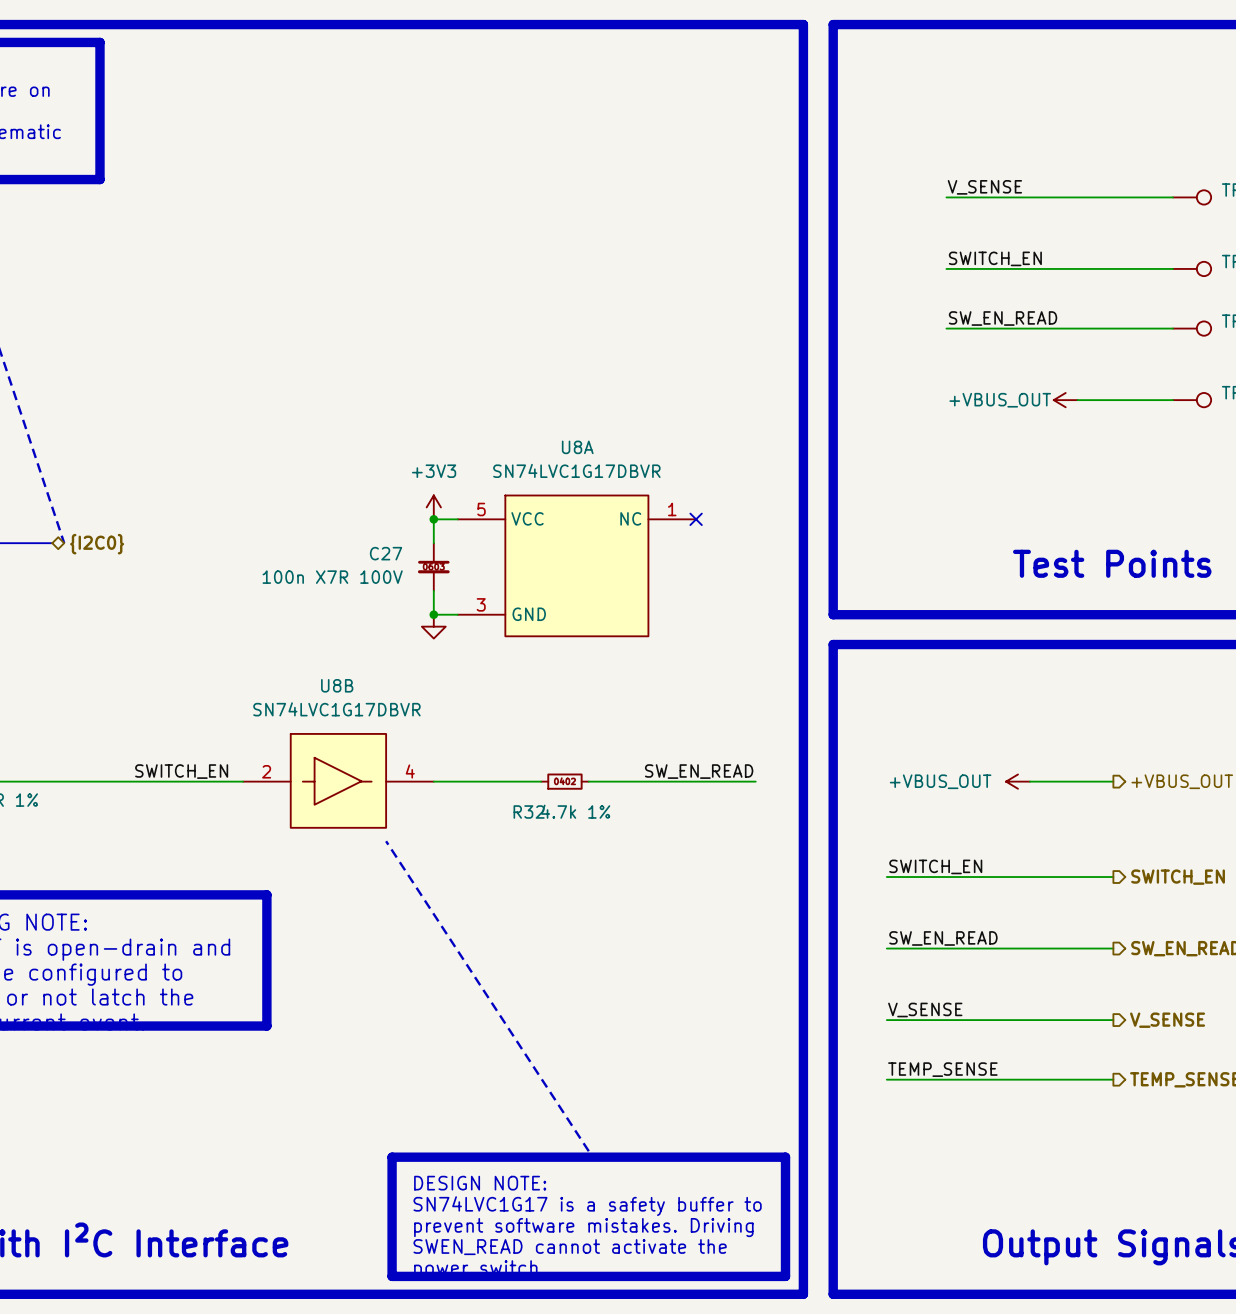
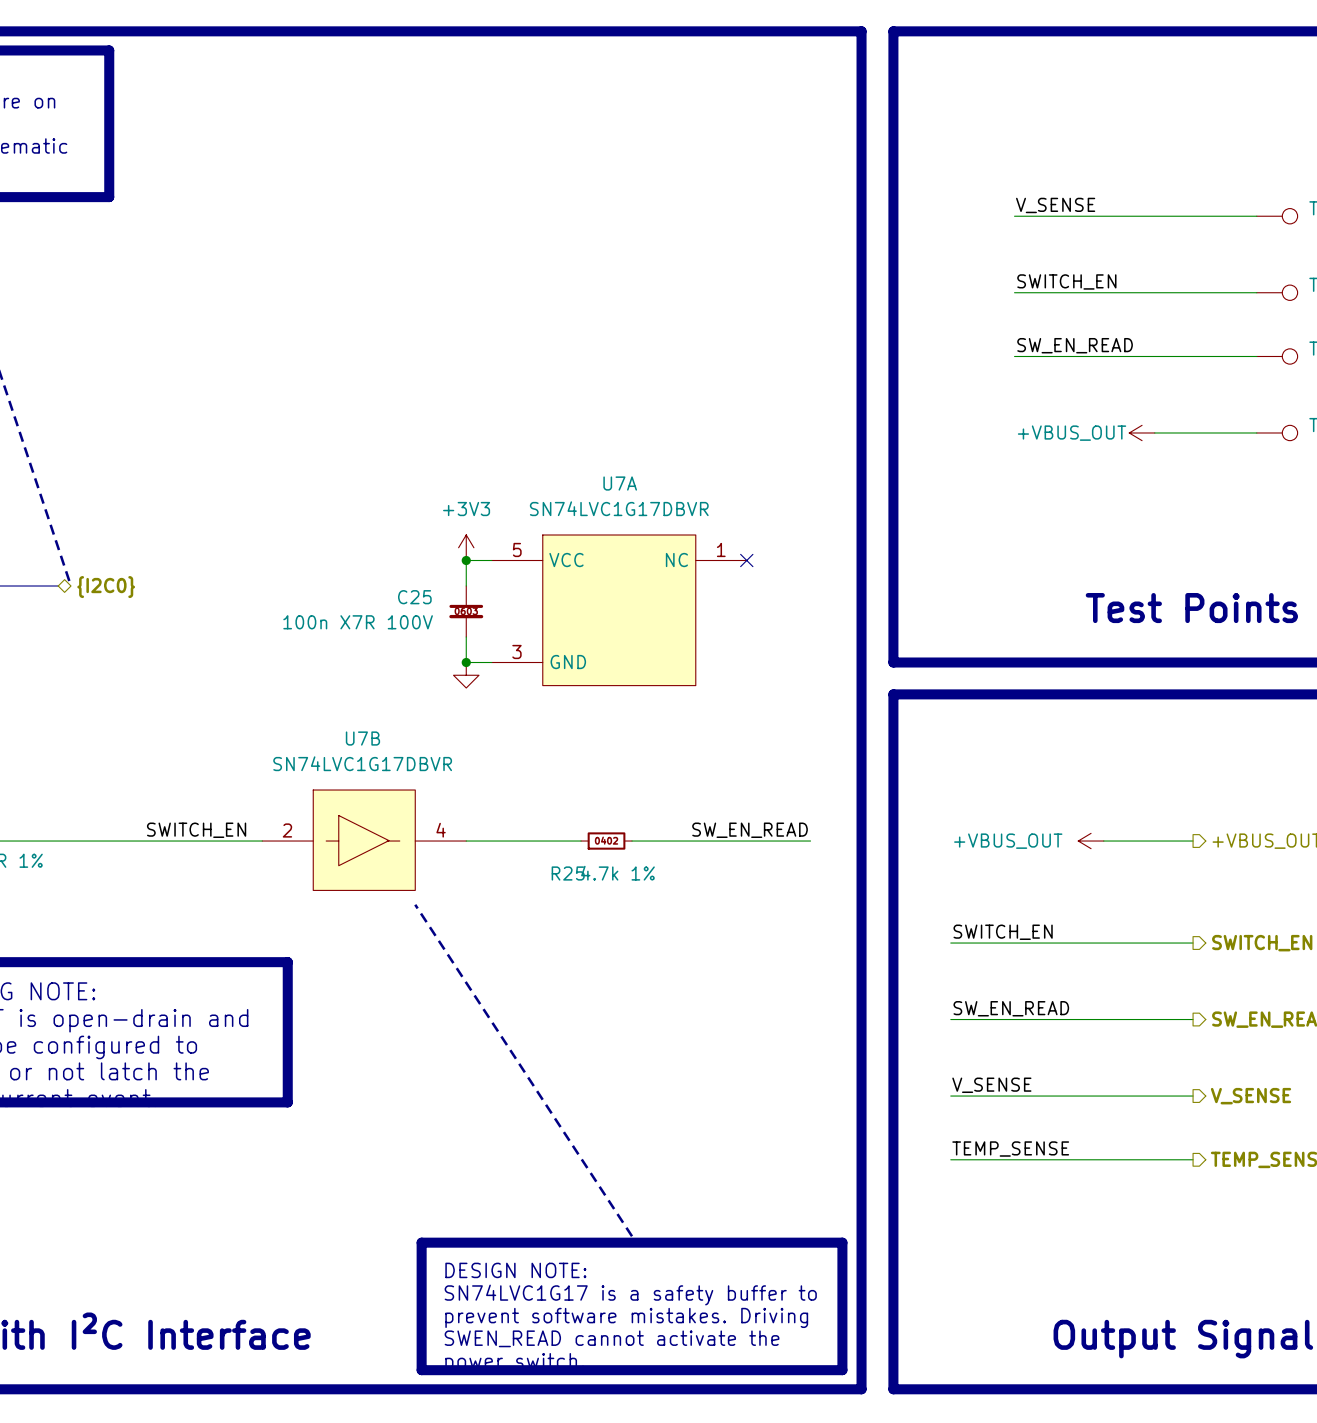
U8A name: U8A (577, 447) -> U7A (620, 483)
C27 name: C27 (386, 553) -> C25 (414, 597)
U8B name: U8B (337, 685) -> U7B (362, 738)
R32 name: R32 (529, 812) -> R25 (568, 873)

